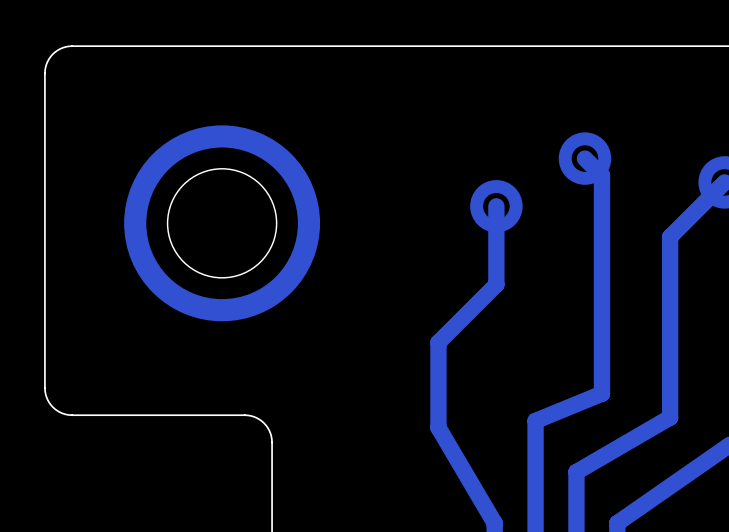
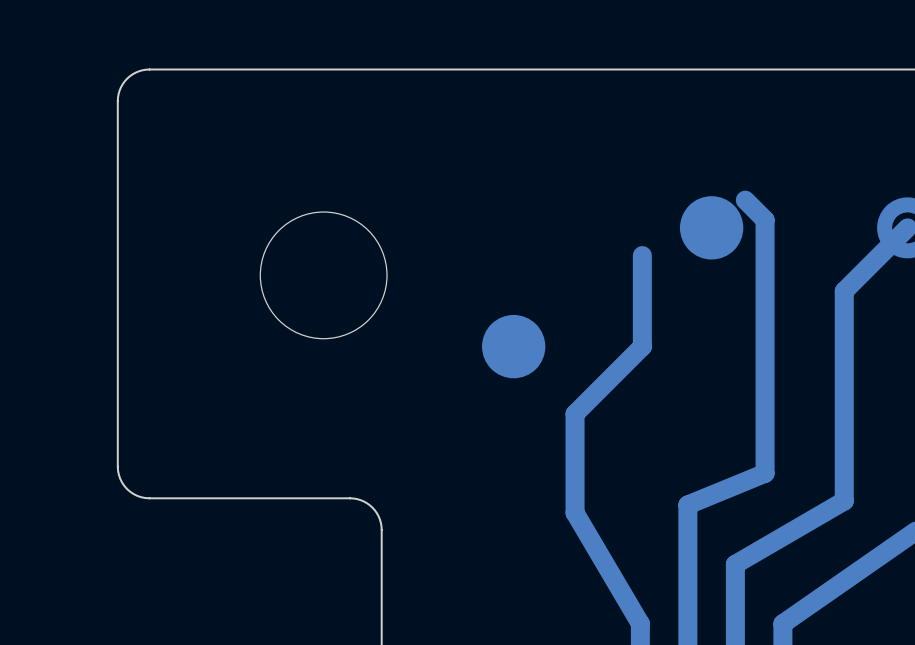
drawing: [124, 125, 321, 322] -> none
drawing: [470, 132, 612, 233] -> none
drawing: none -> [679, 196, 744, 260]
drawing: none -> [482, 314, 546, 379]

